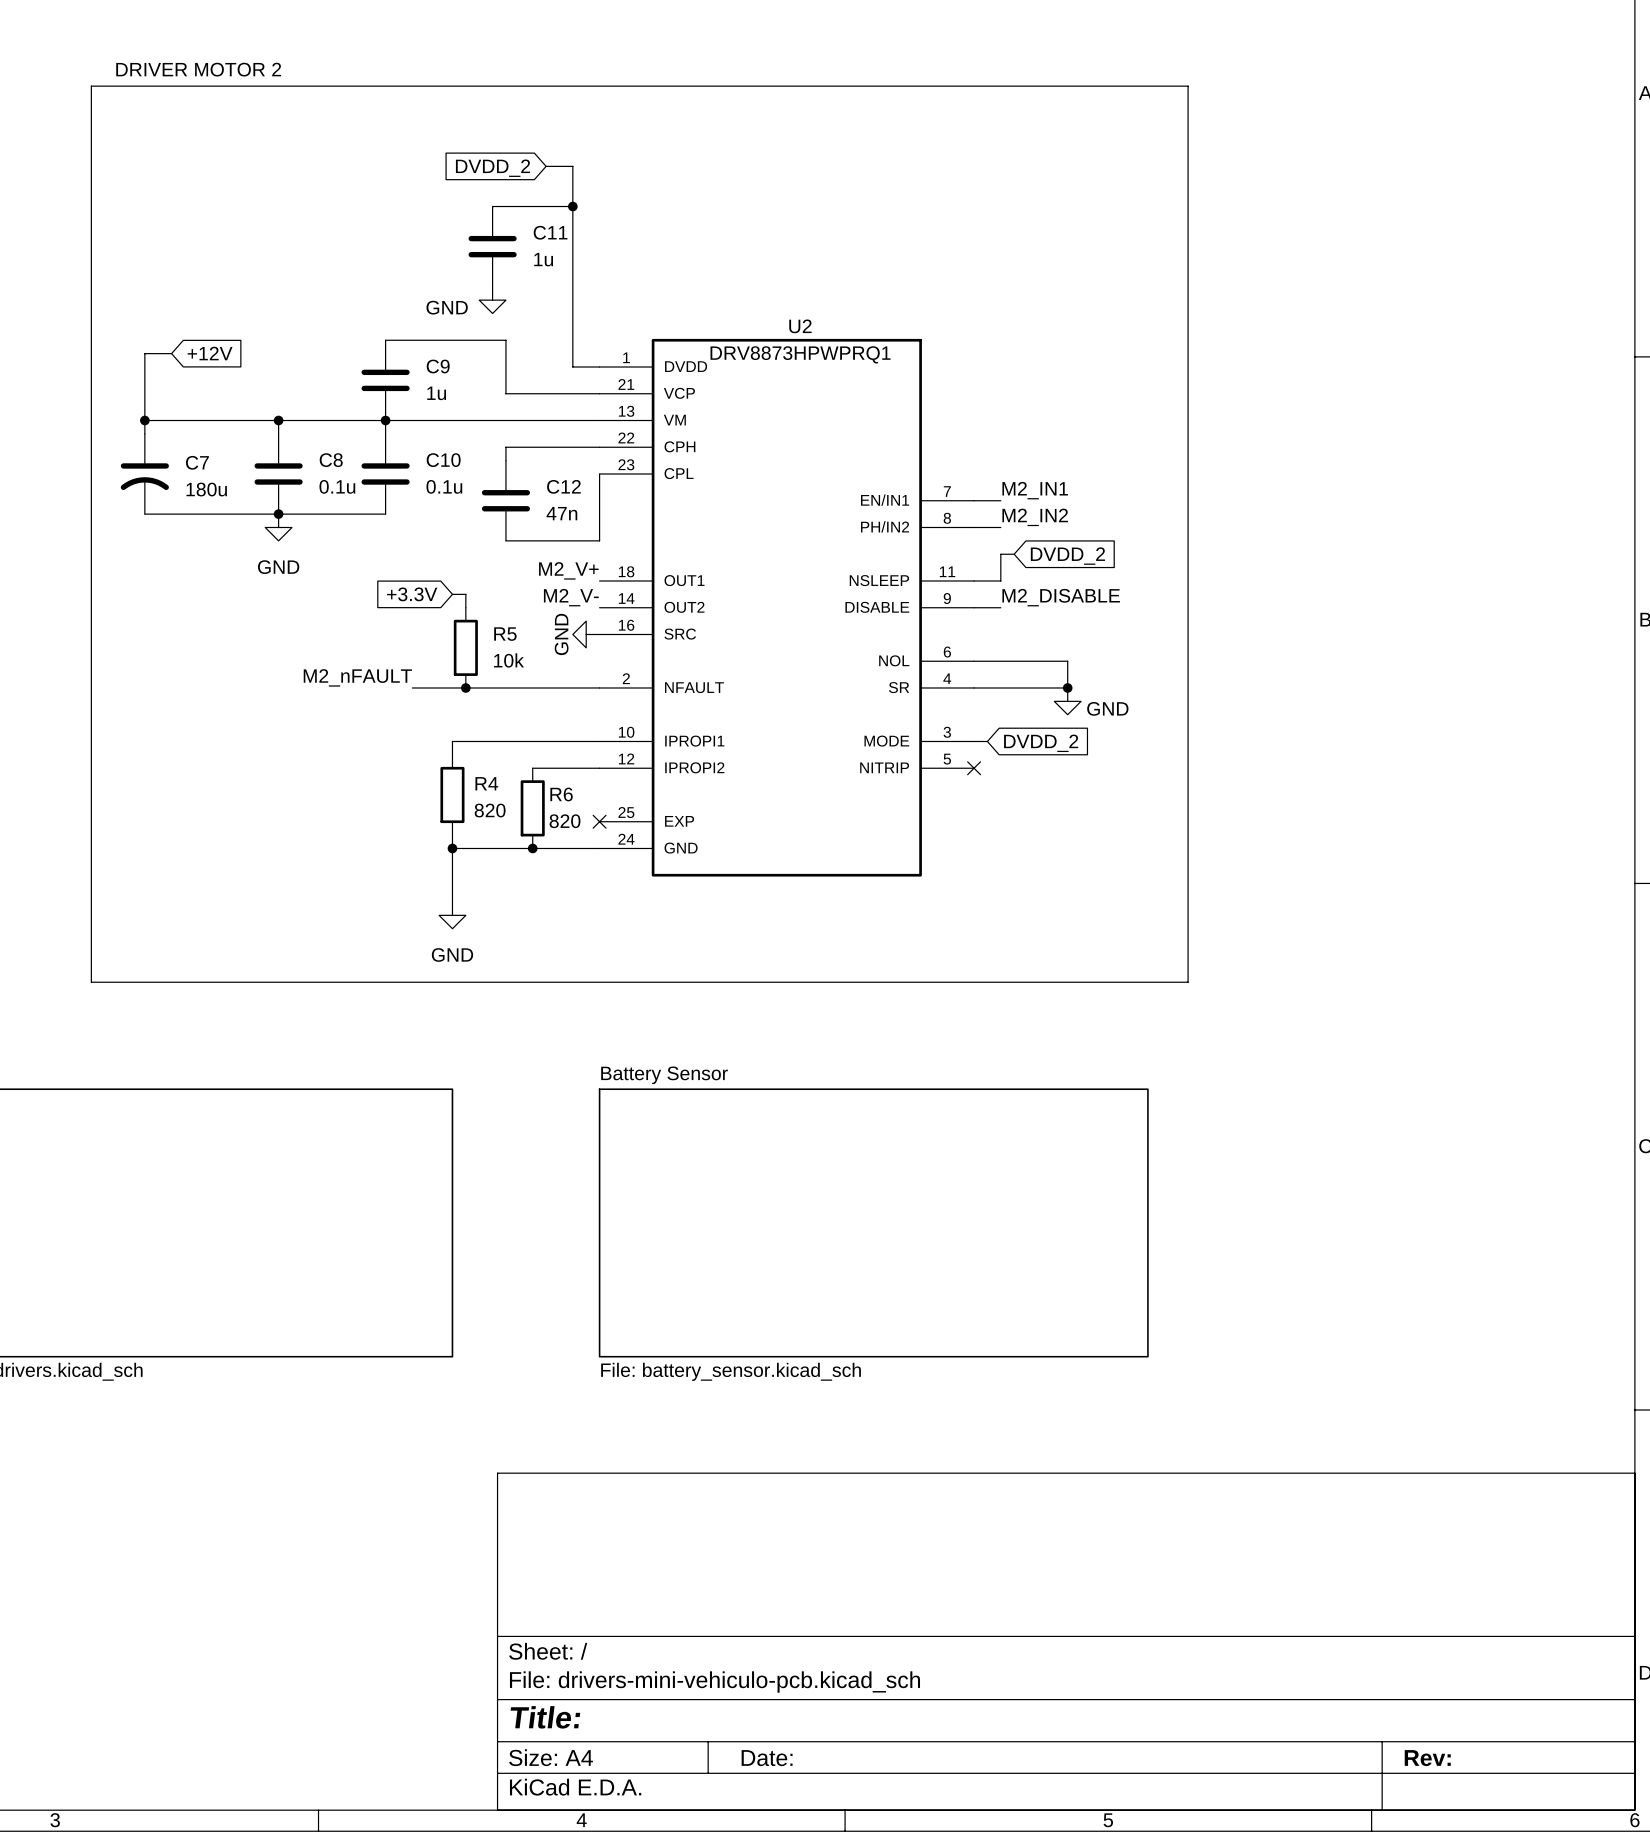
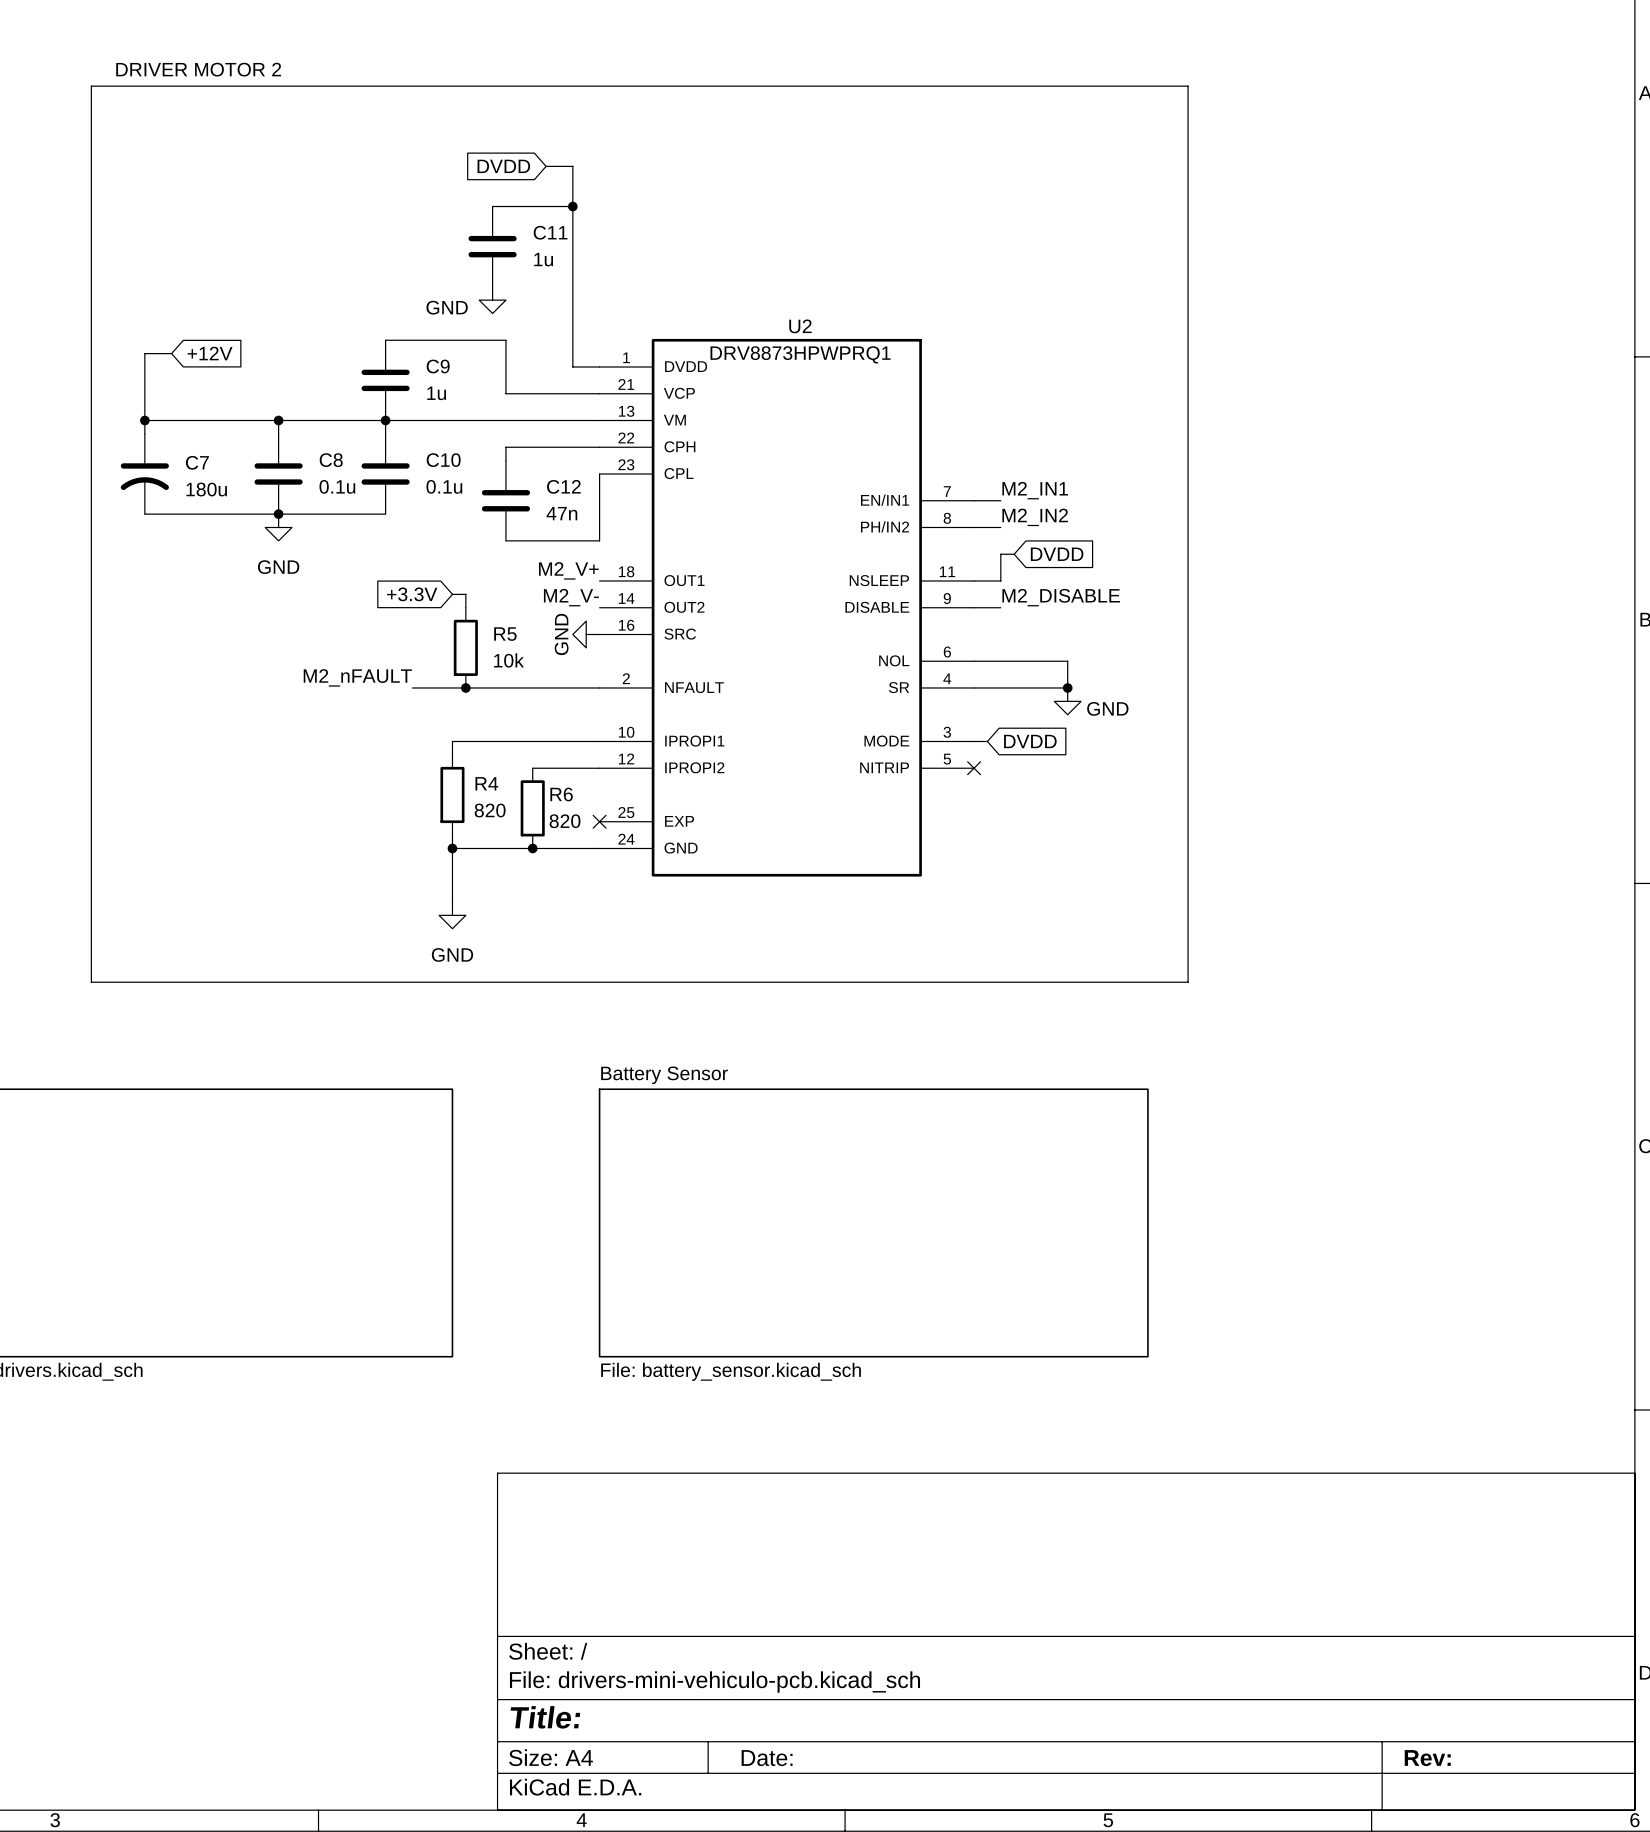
global label: DVDD_2 (493, 168) -> DVDD (503, 166)
global label: DVDD_2 (1067, 556) -> DVDD (1057, 554)
global label: DVDD_2 (1041, 743) -> DVDD (1030, 741)

